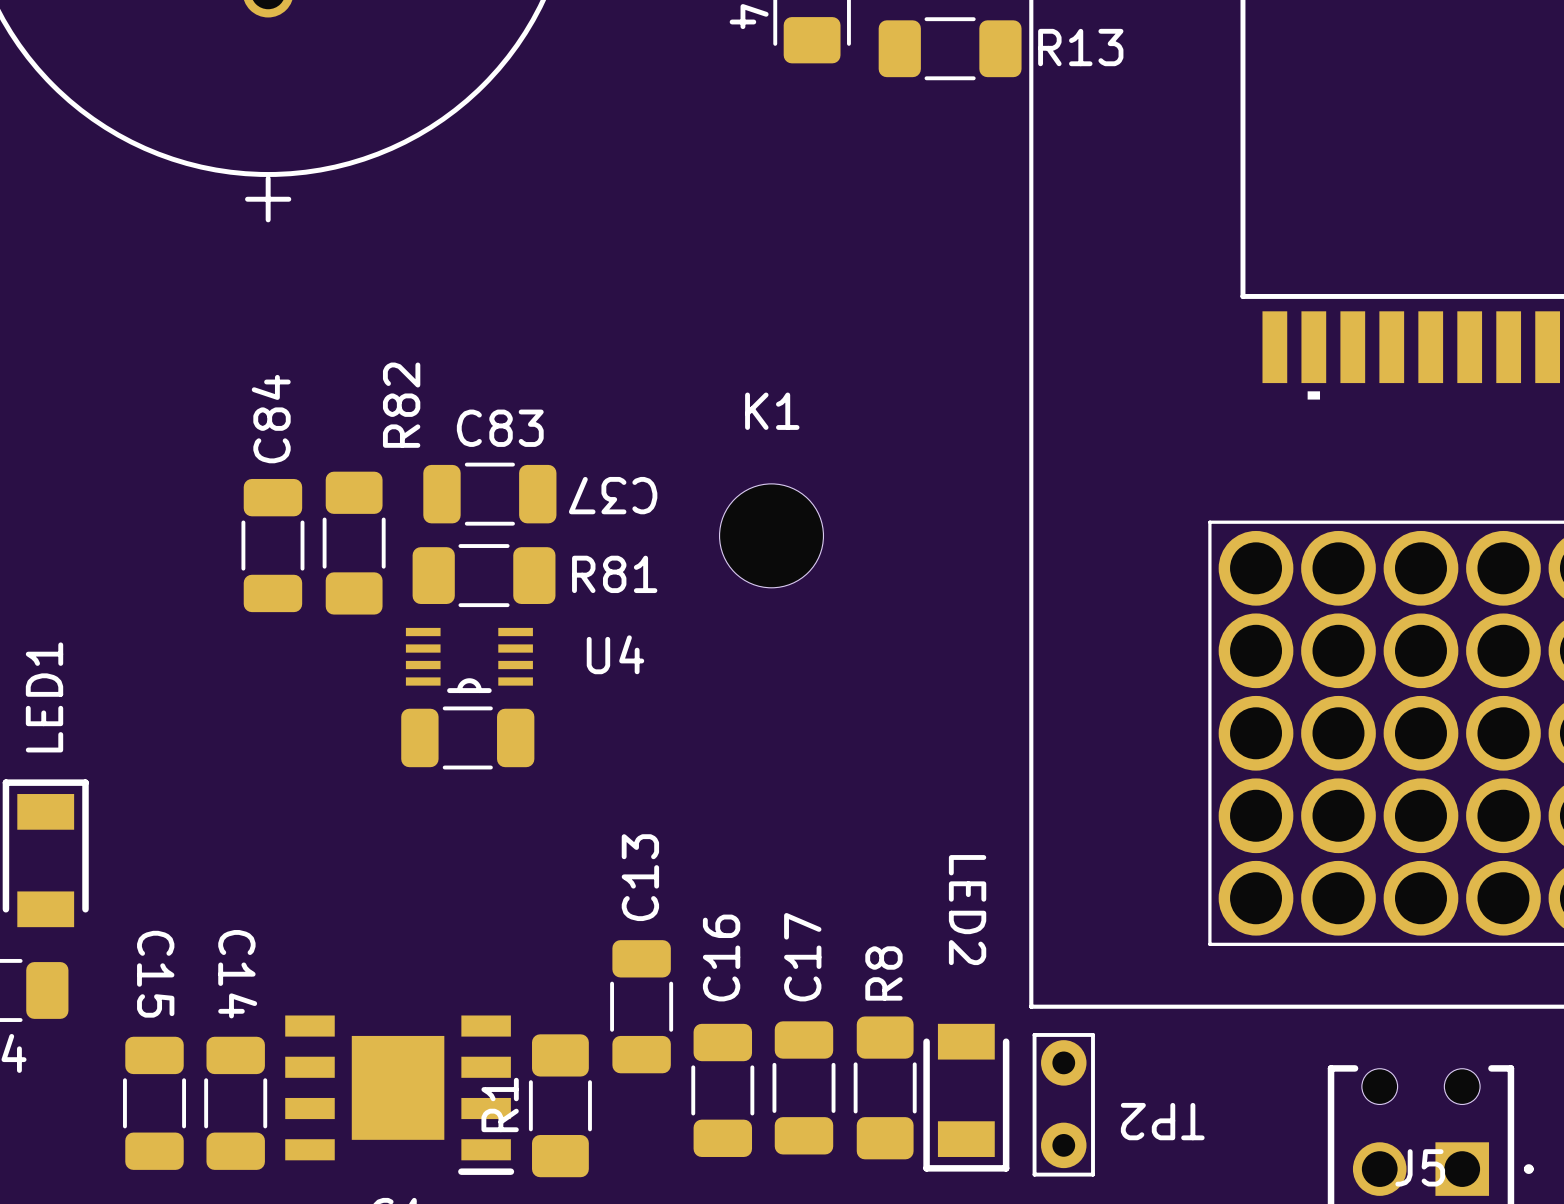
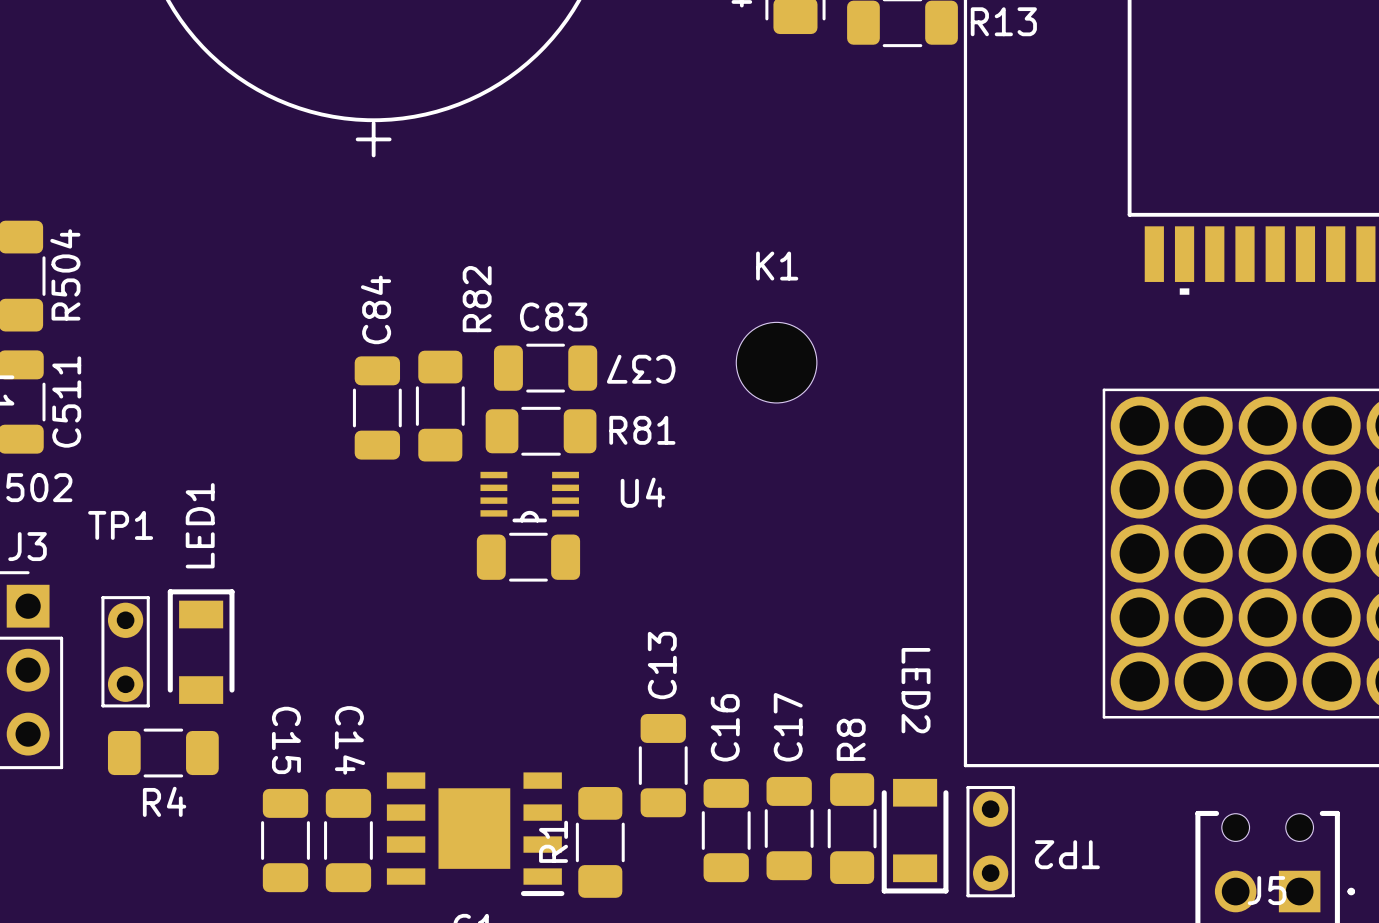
K1 position: (771, 535) -> (776, 362)

